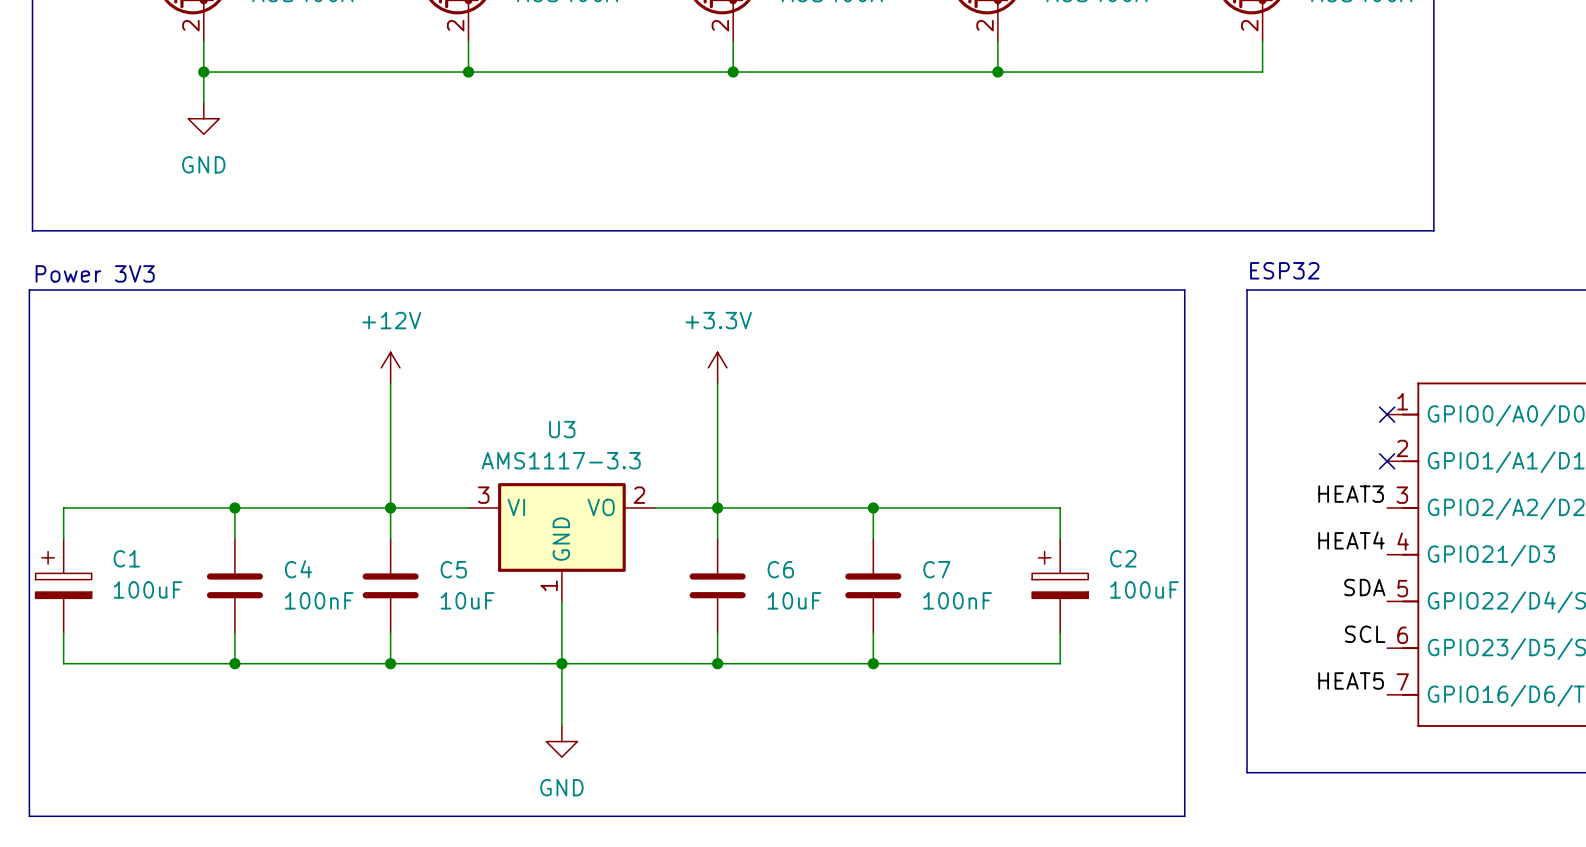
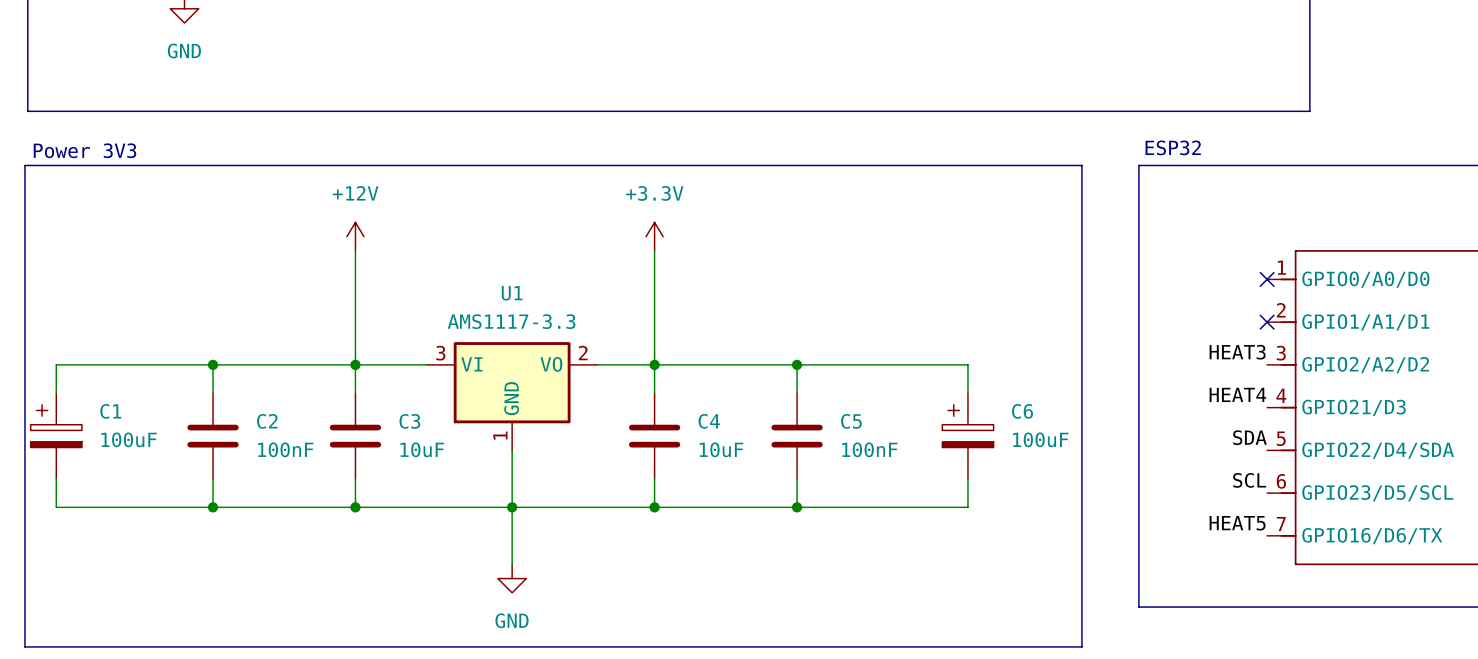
U3 name: U3 (562, 429) -> U1 (512, 293)
C2 name: C2 (1123, 558) -> C6 (1022, 411)
C4 name: C4 (298, 569) -> C2 (267, 421)
C5 name: C5 (453, 569) -> C3 (409, 421)
C6 name: C6 (780, 569) -> C4 (709, 421)
C7 name: C7 (936, 569) -> C5 (851, 421)

